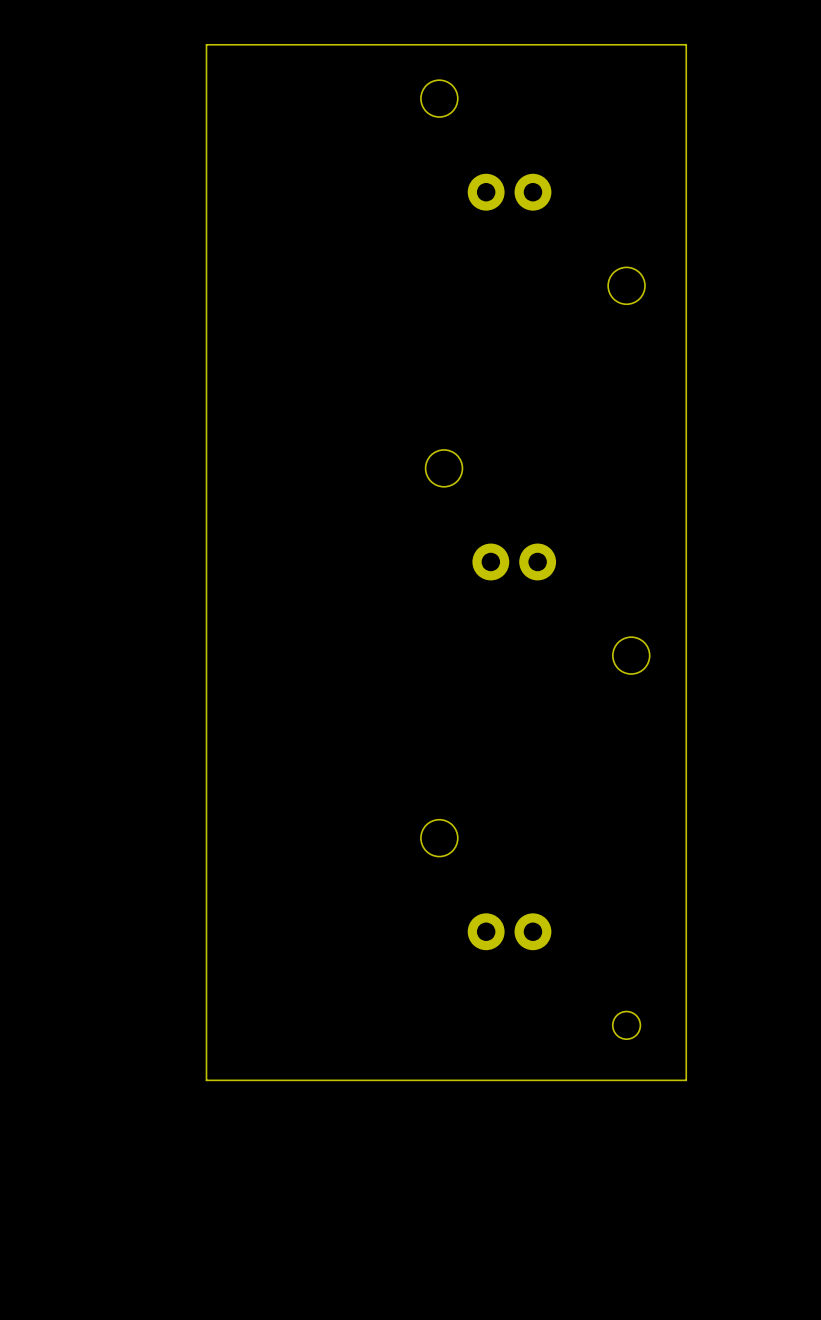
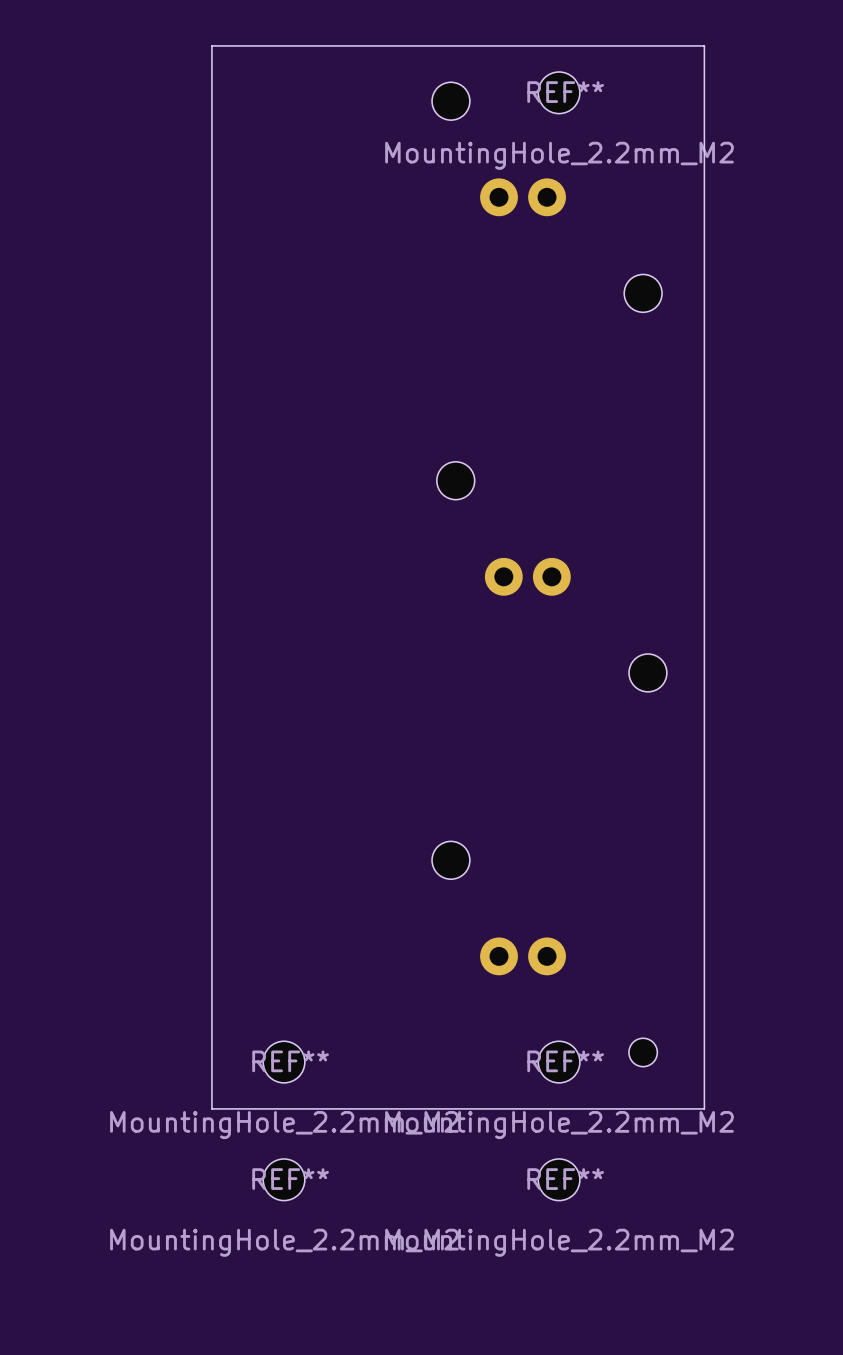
REF**: none -> MountingHole_2.2mm_M2 (559, 92)
REF**: none -> MountingHole_2.2mm_M2 (284, 1062)
REF**: none -> MountingHole_2.2mm_M2 (559, 1062)
REF**: none -> MountingHole_2.2mm_M2 (284, 1179)
REF**: none -> MountingHole_2.2mm_M2 (559, 1179)

